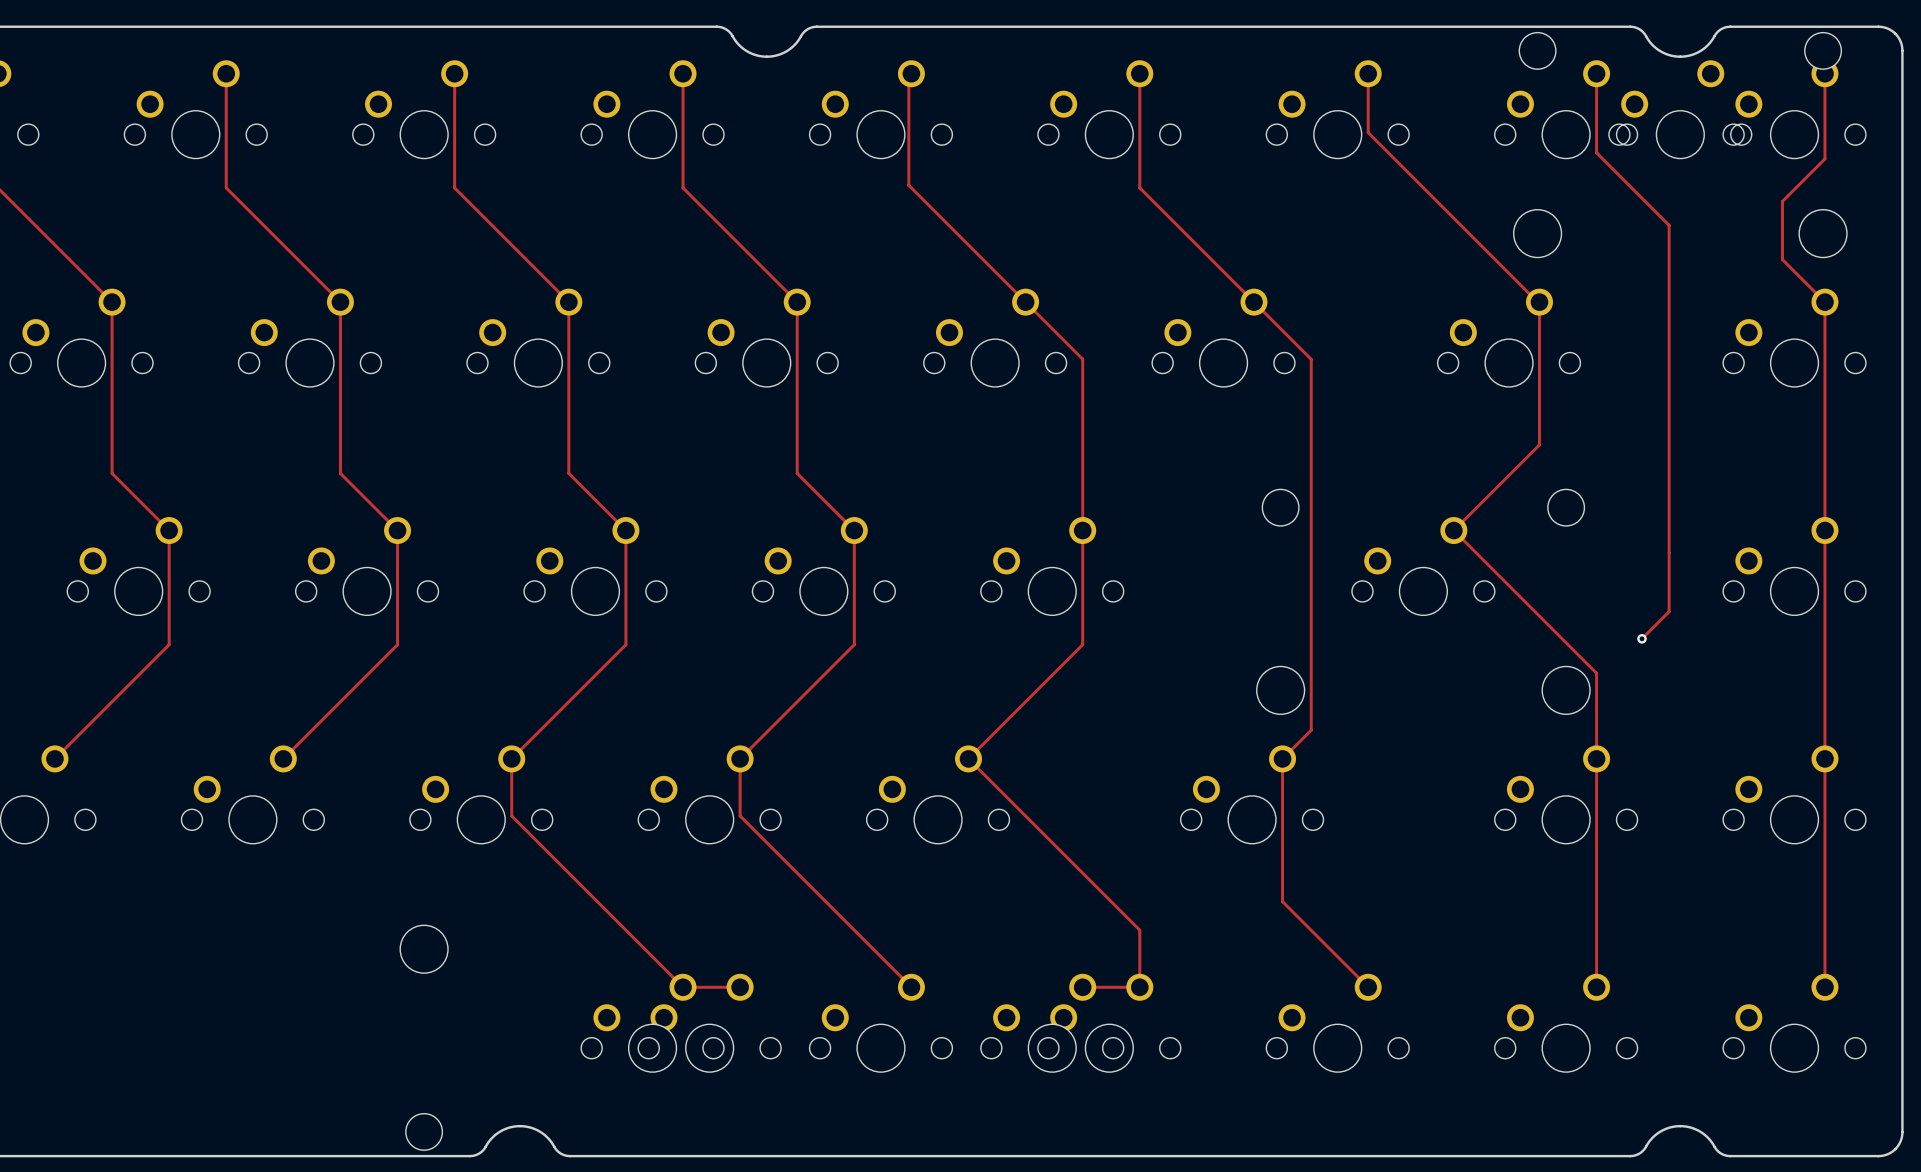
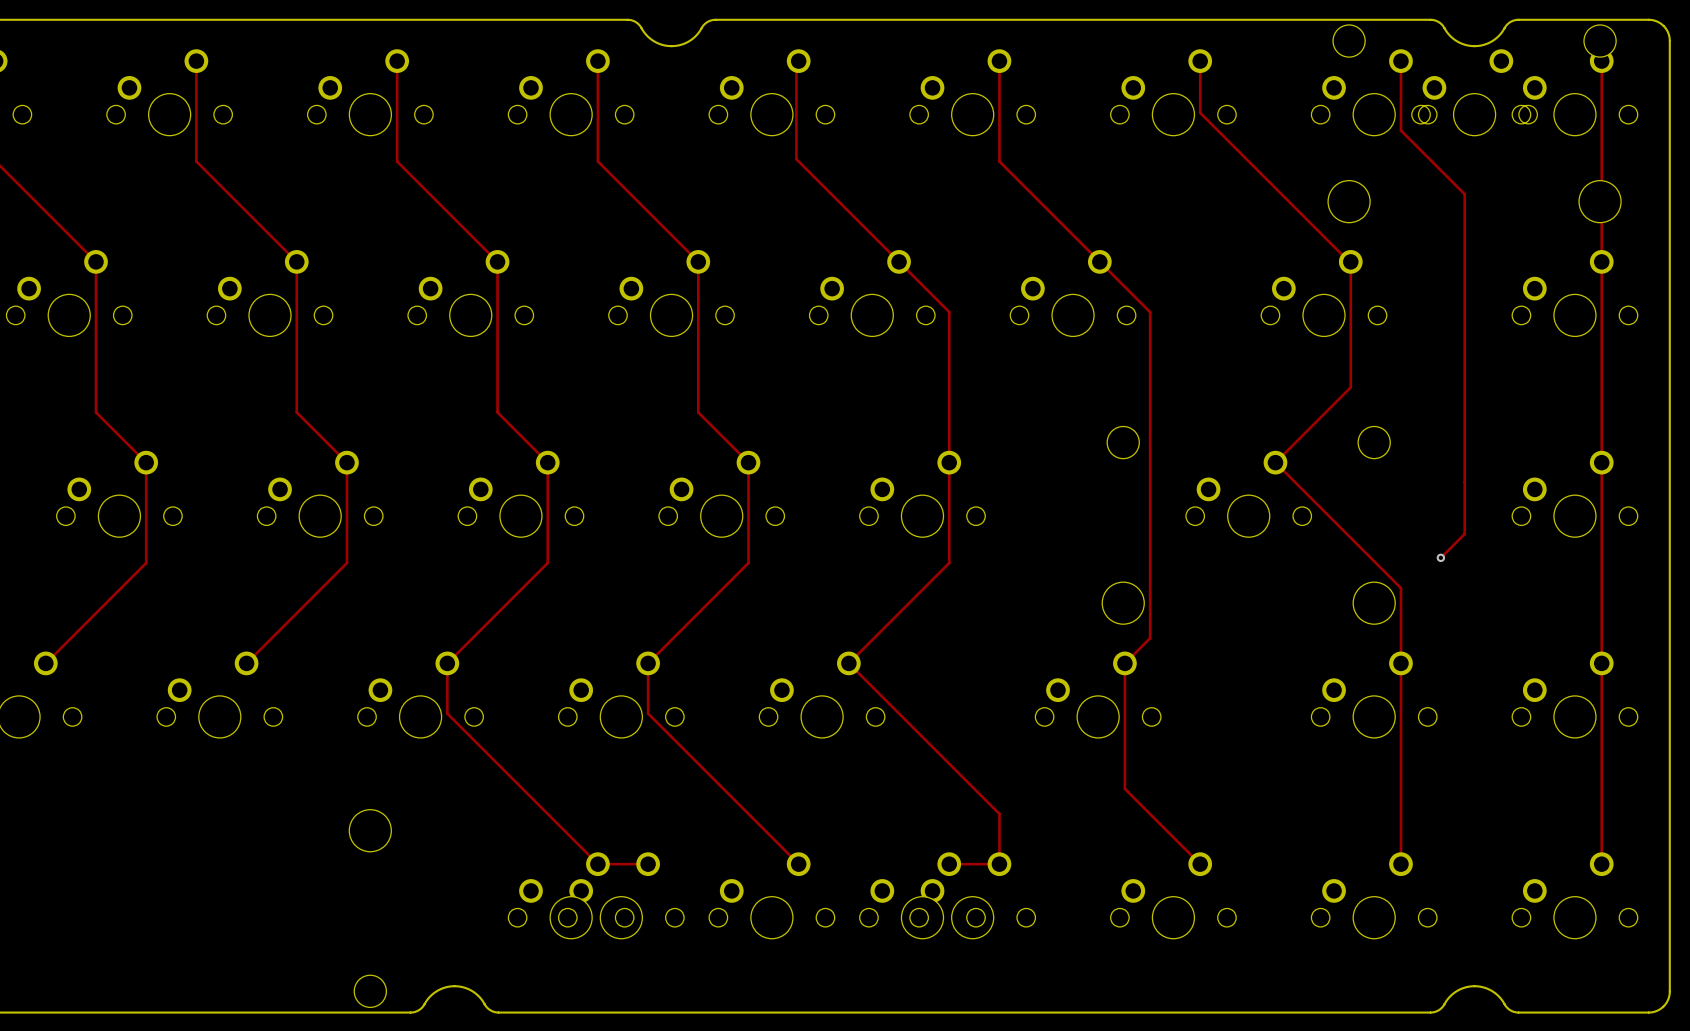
track: (1824, 158) (1782, 201) (1782, 259) (1824, 302) -> (1601, 135) (1601, 259)

